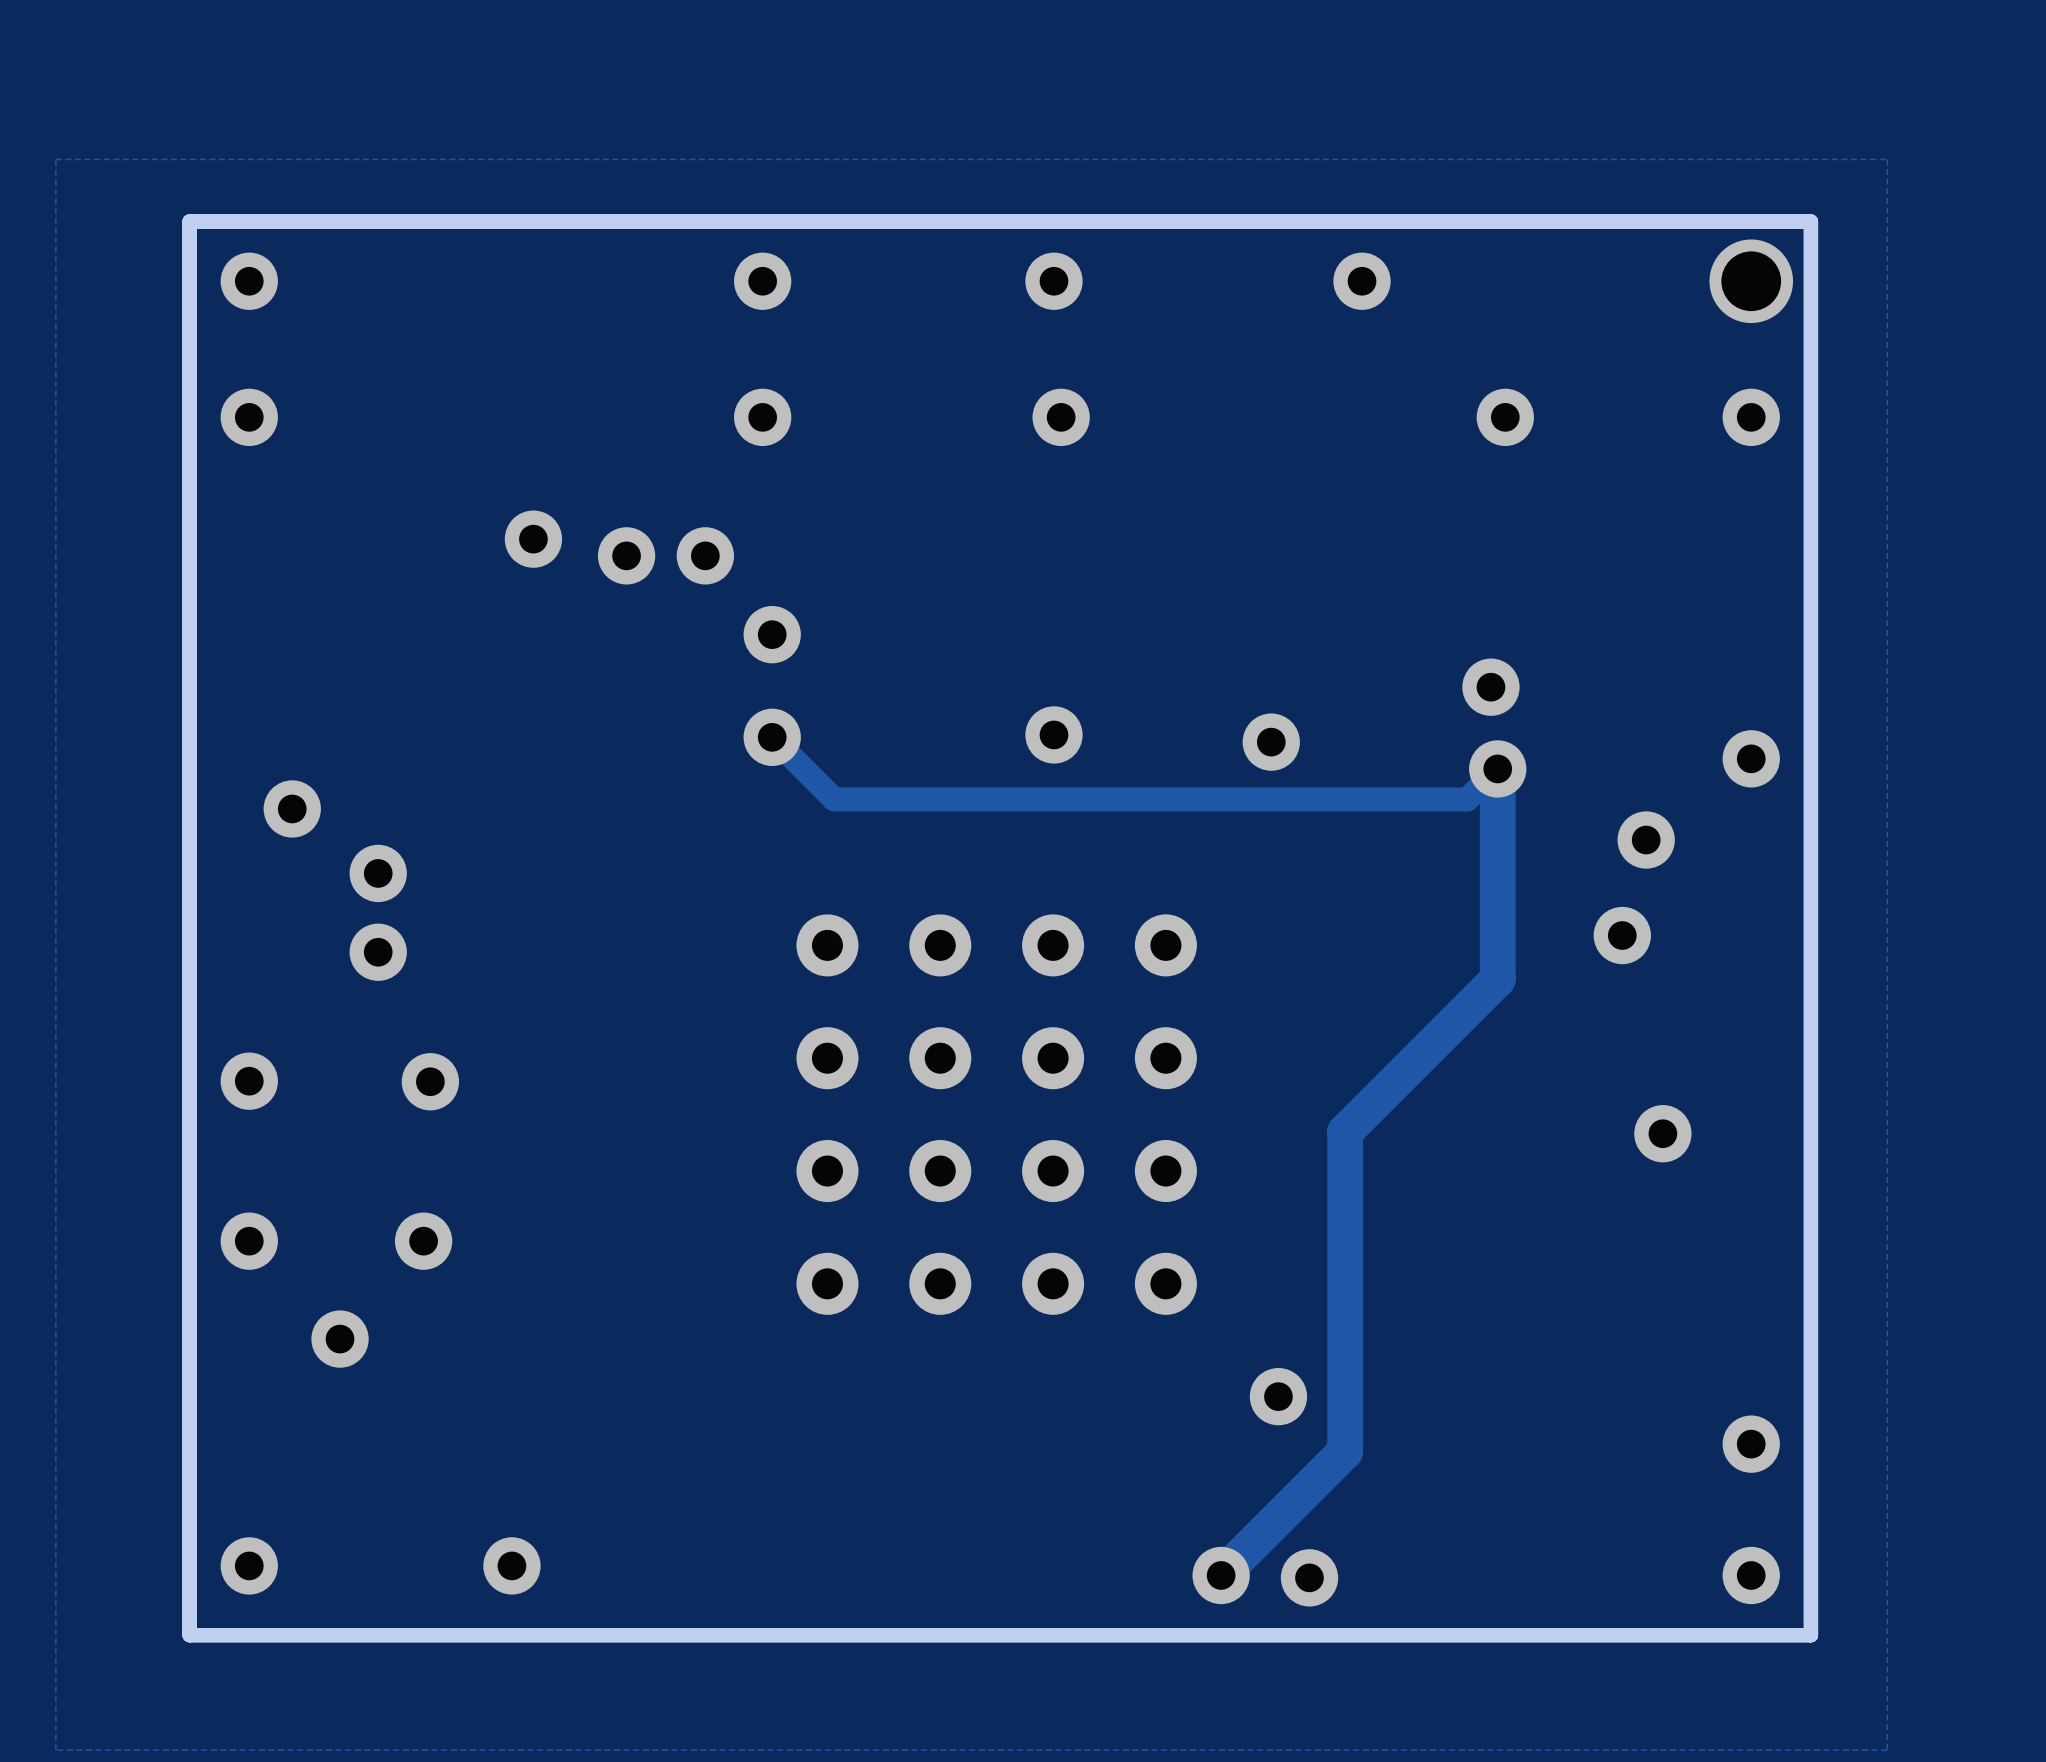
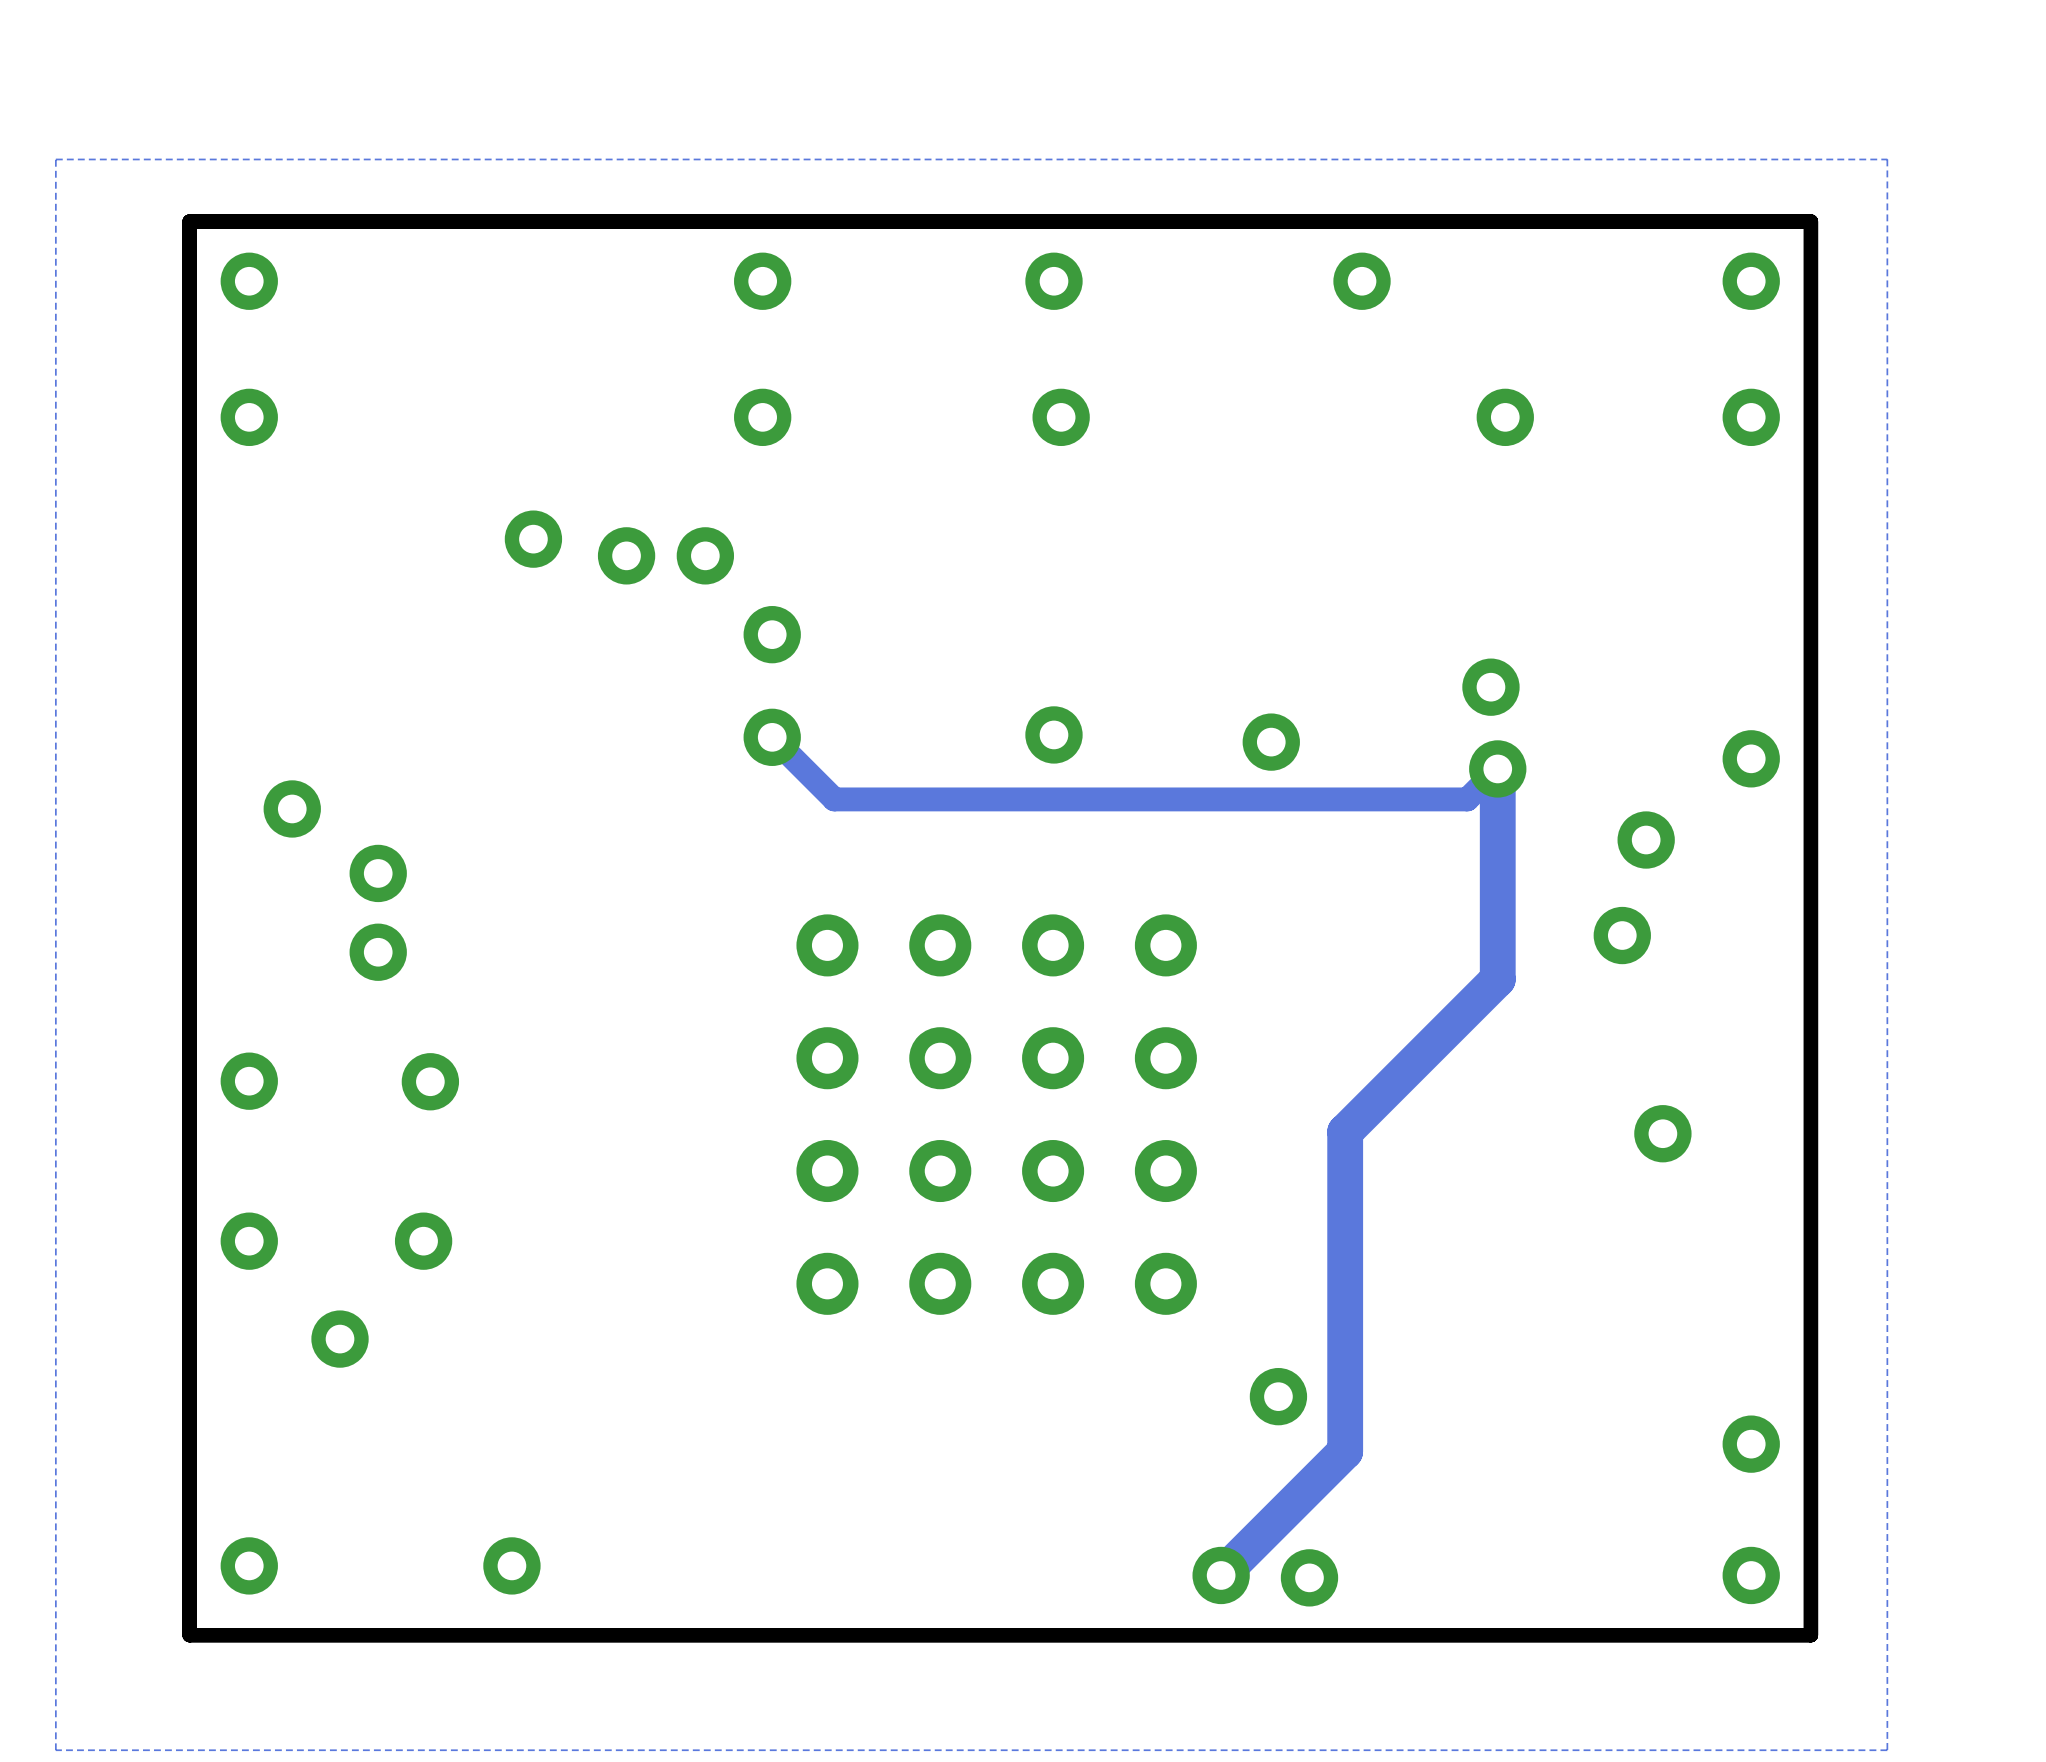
via size: [1709, 239, 1794, 324] -> [1722, 252, 1780, 310]

